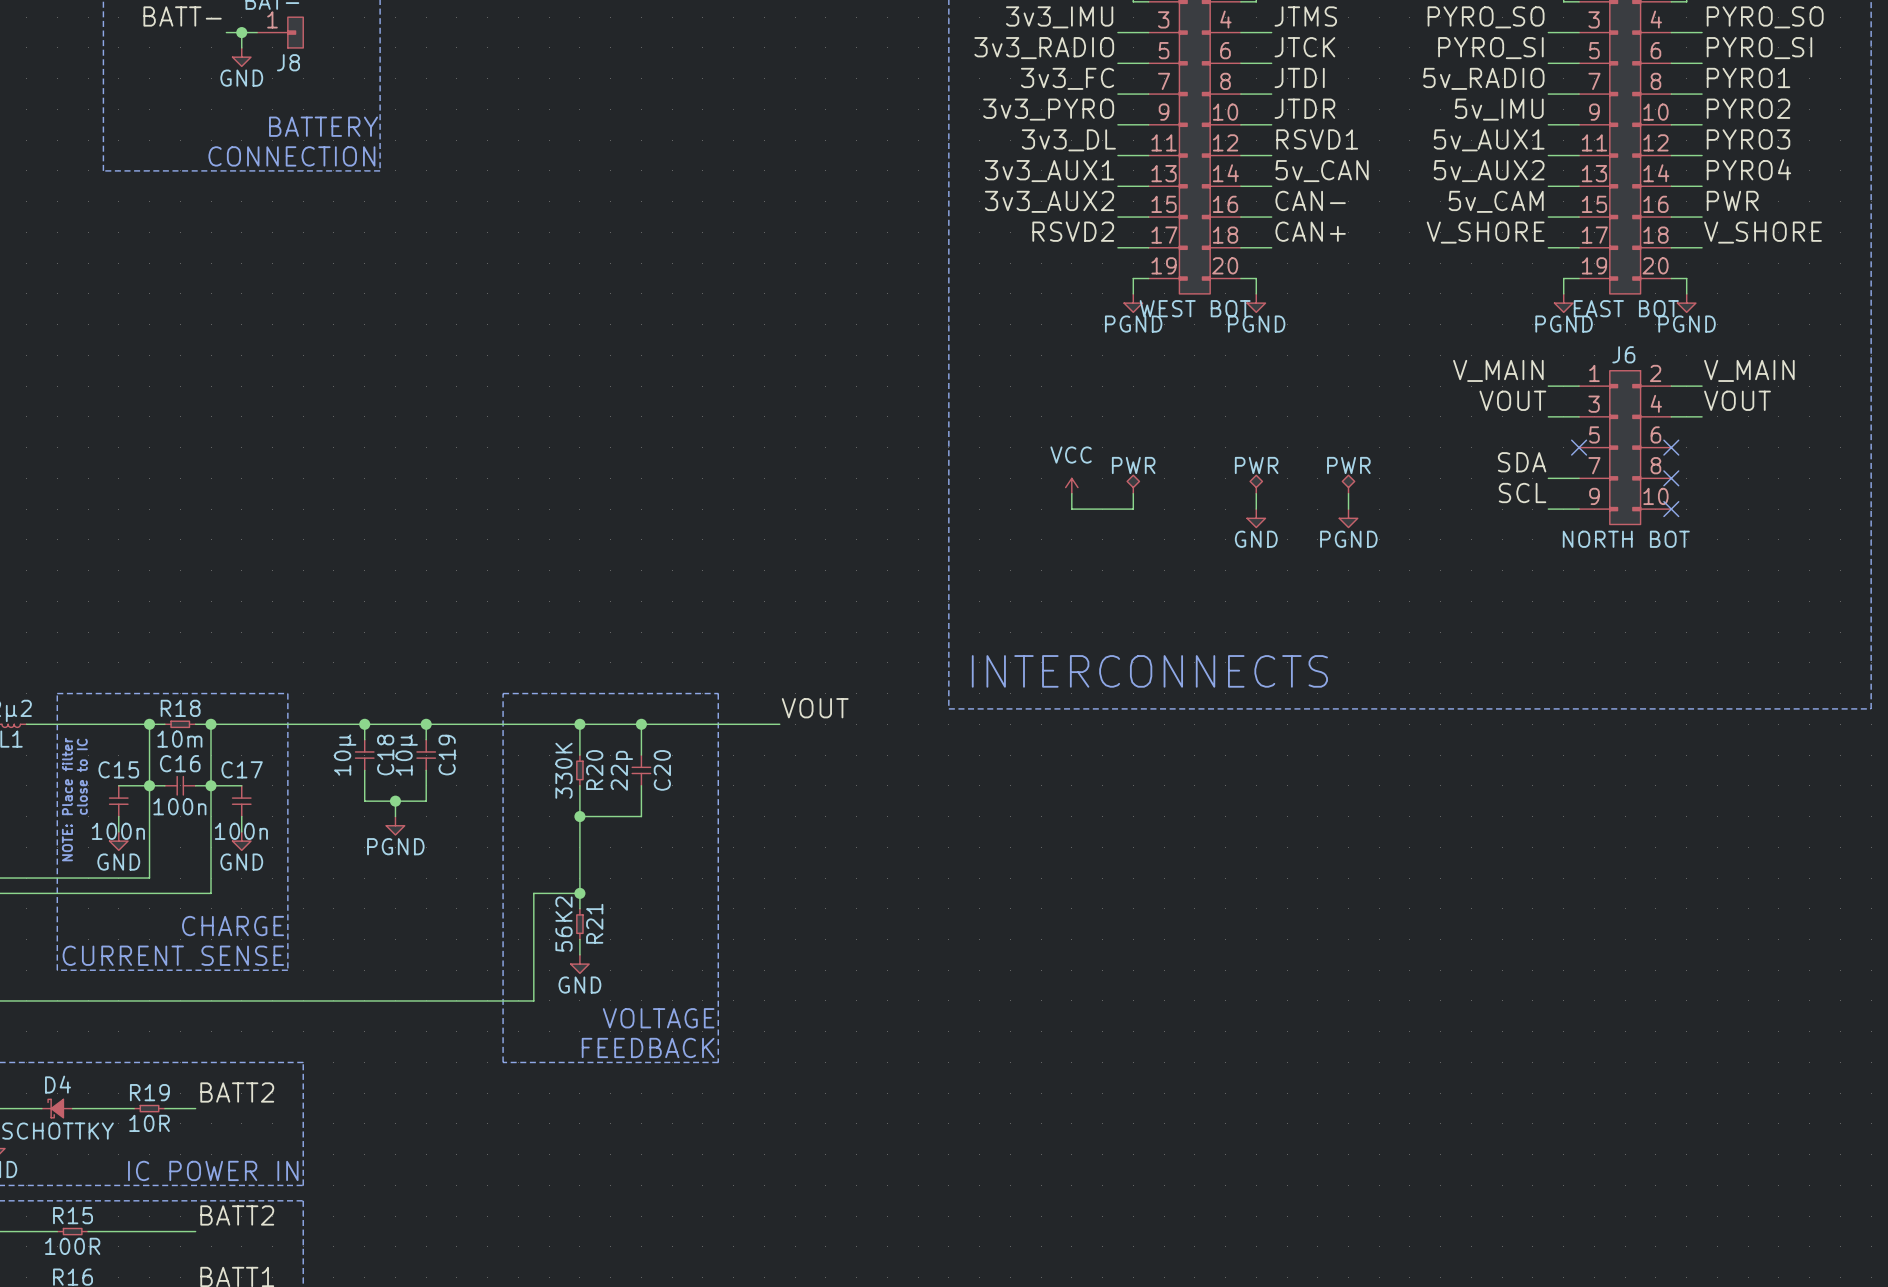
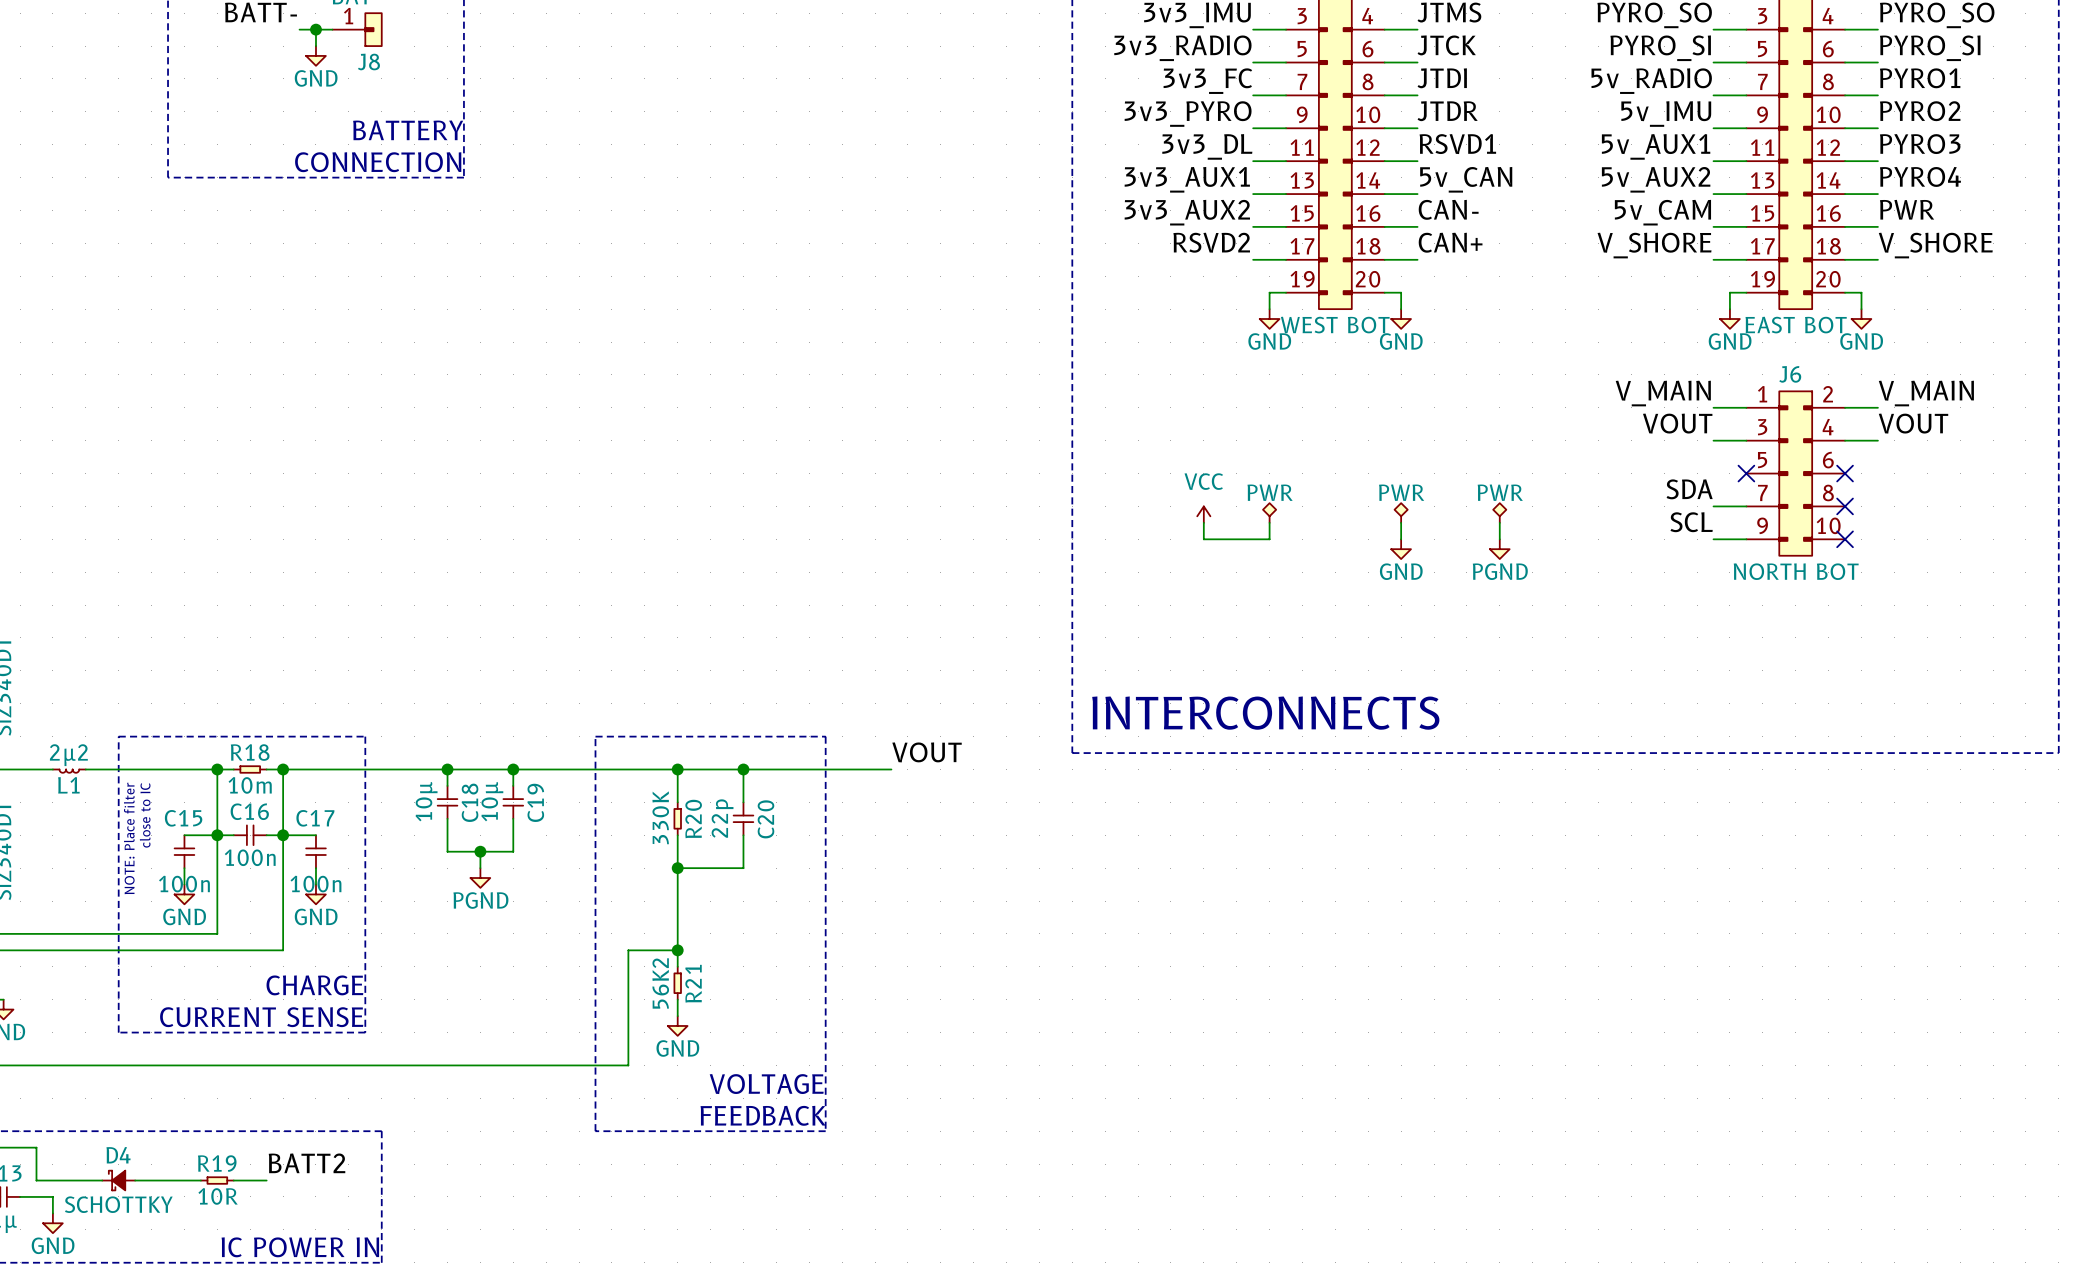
power symbol: PGND (1133, 303) -> GND (1269, 319)
power symbol: PGND (1256, 303) -> GND (1401, 319)
power symbol: PGND (1563, 303) -> GND (1729, 319)
power symbol: PGND (1686, 303) -> GND (1861, 319)

